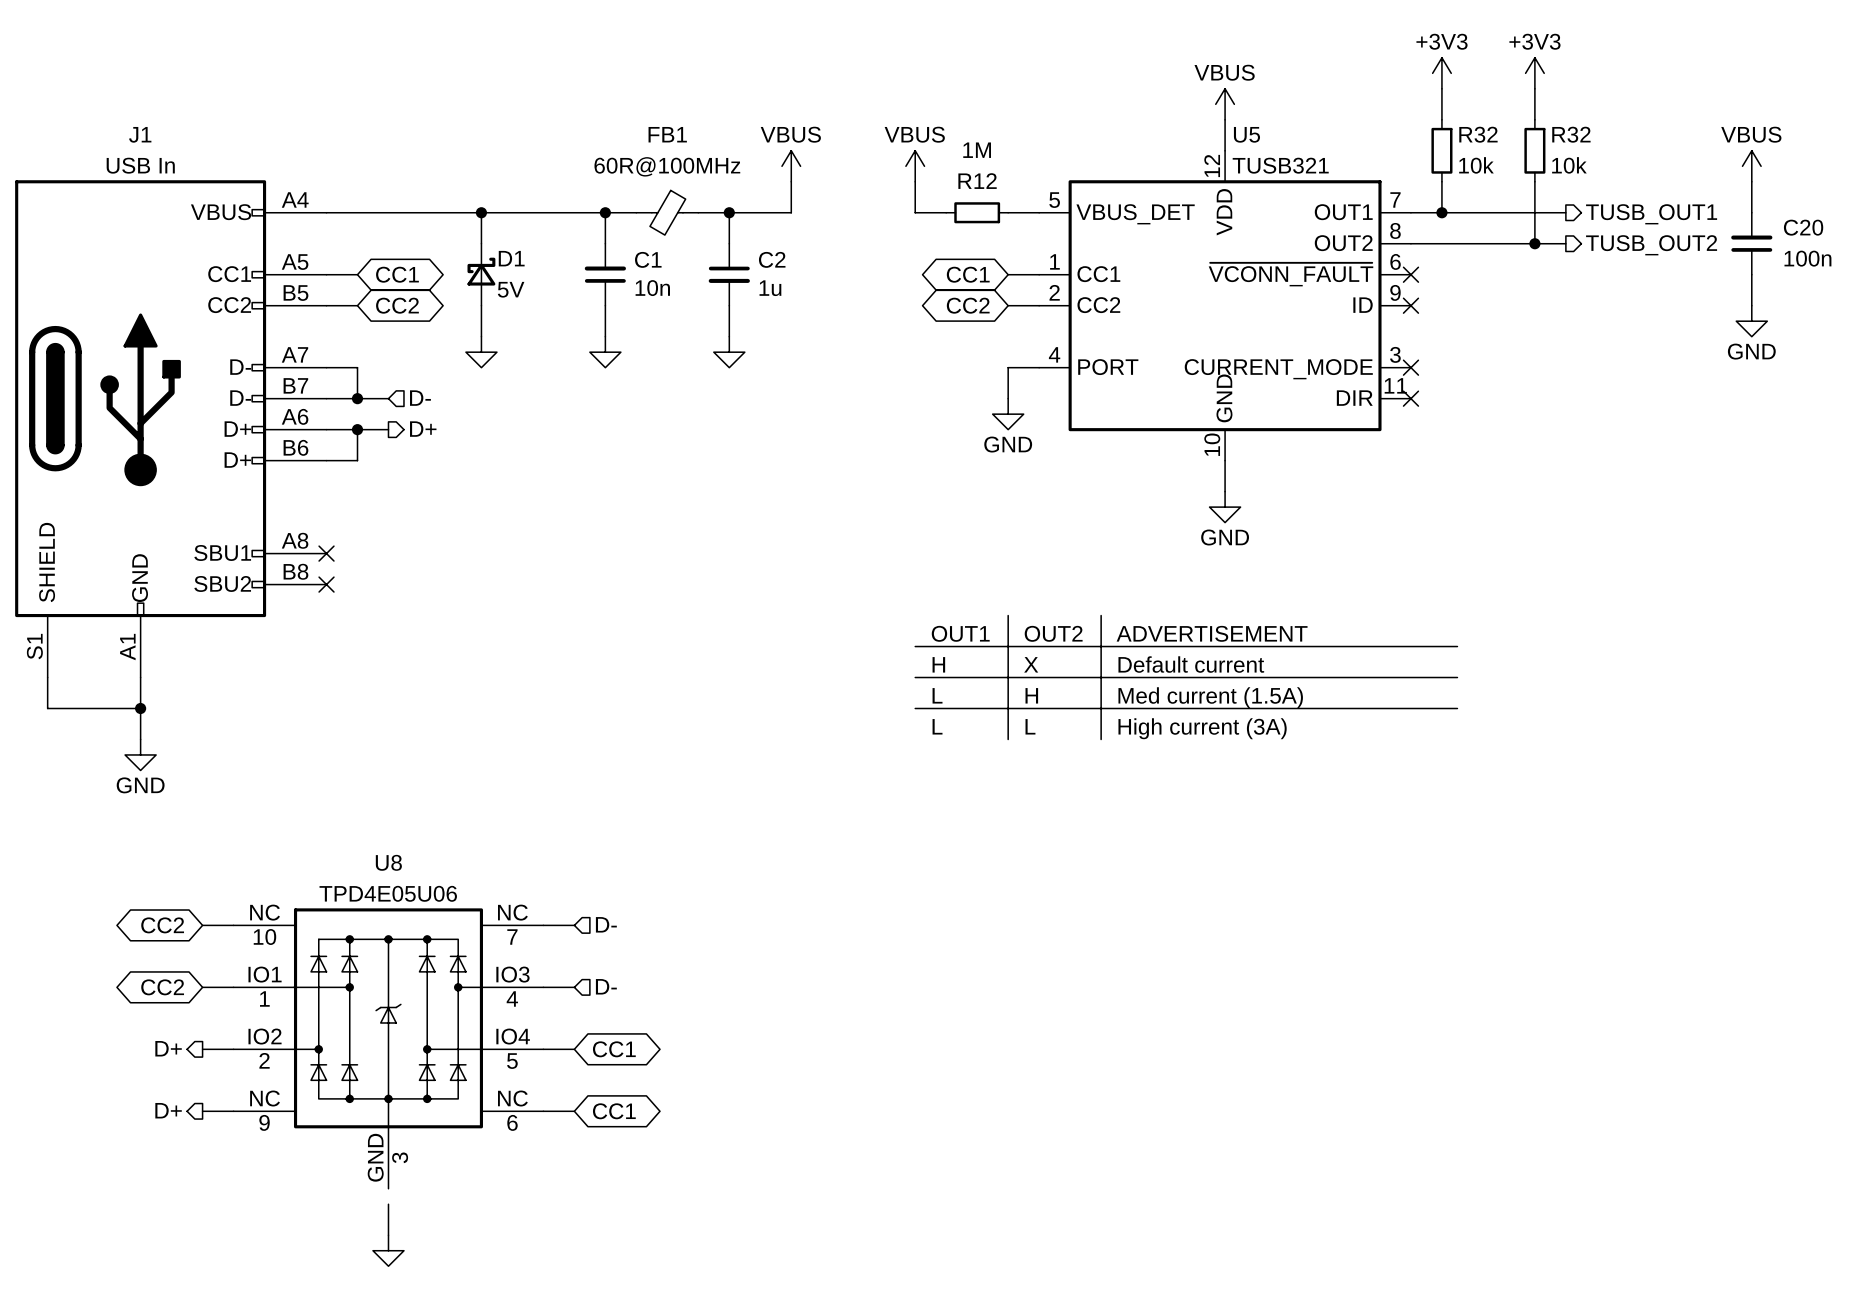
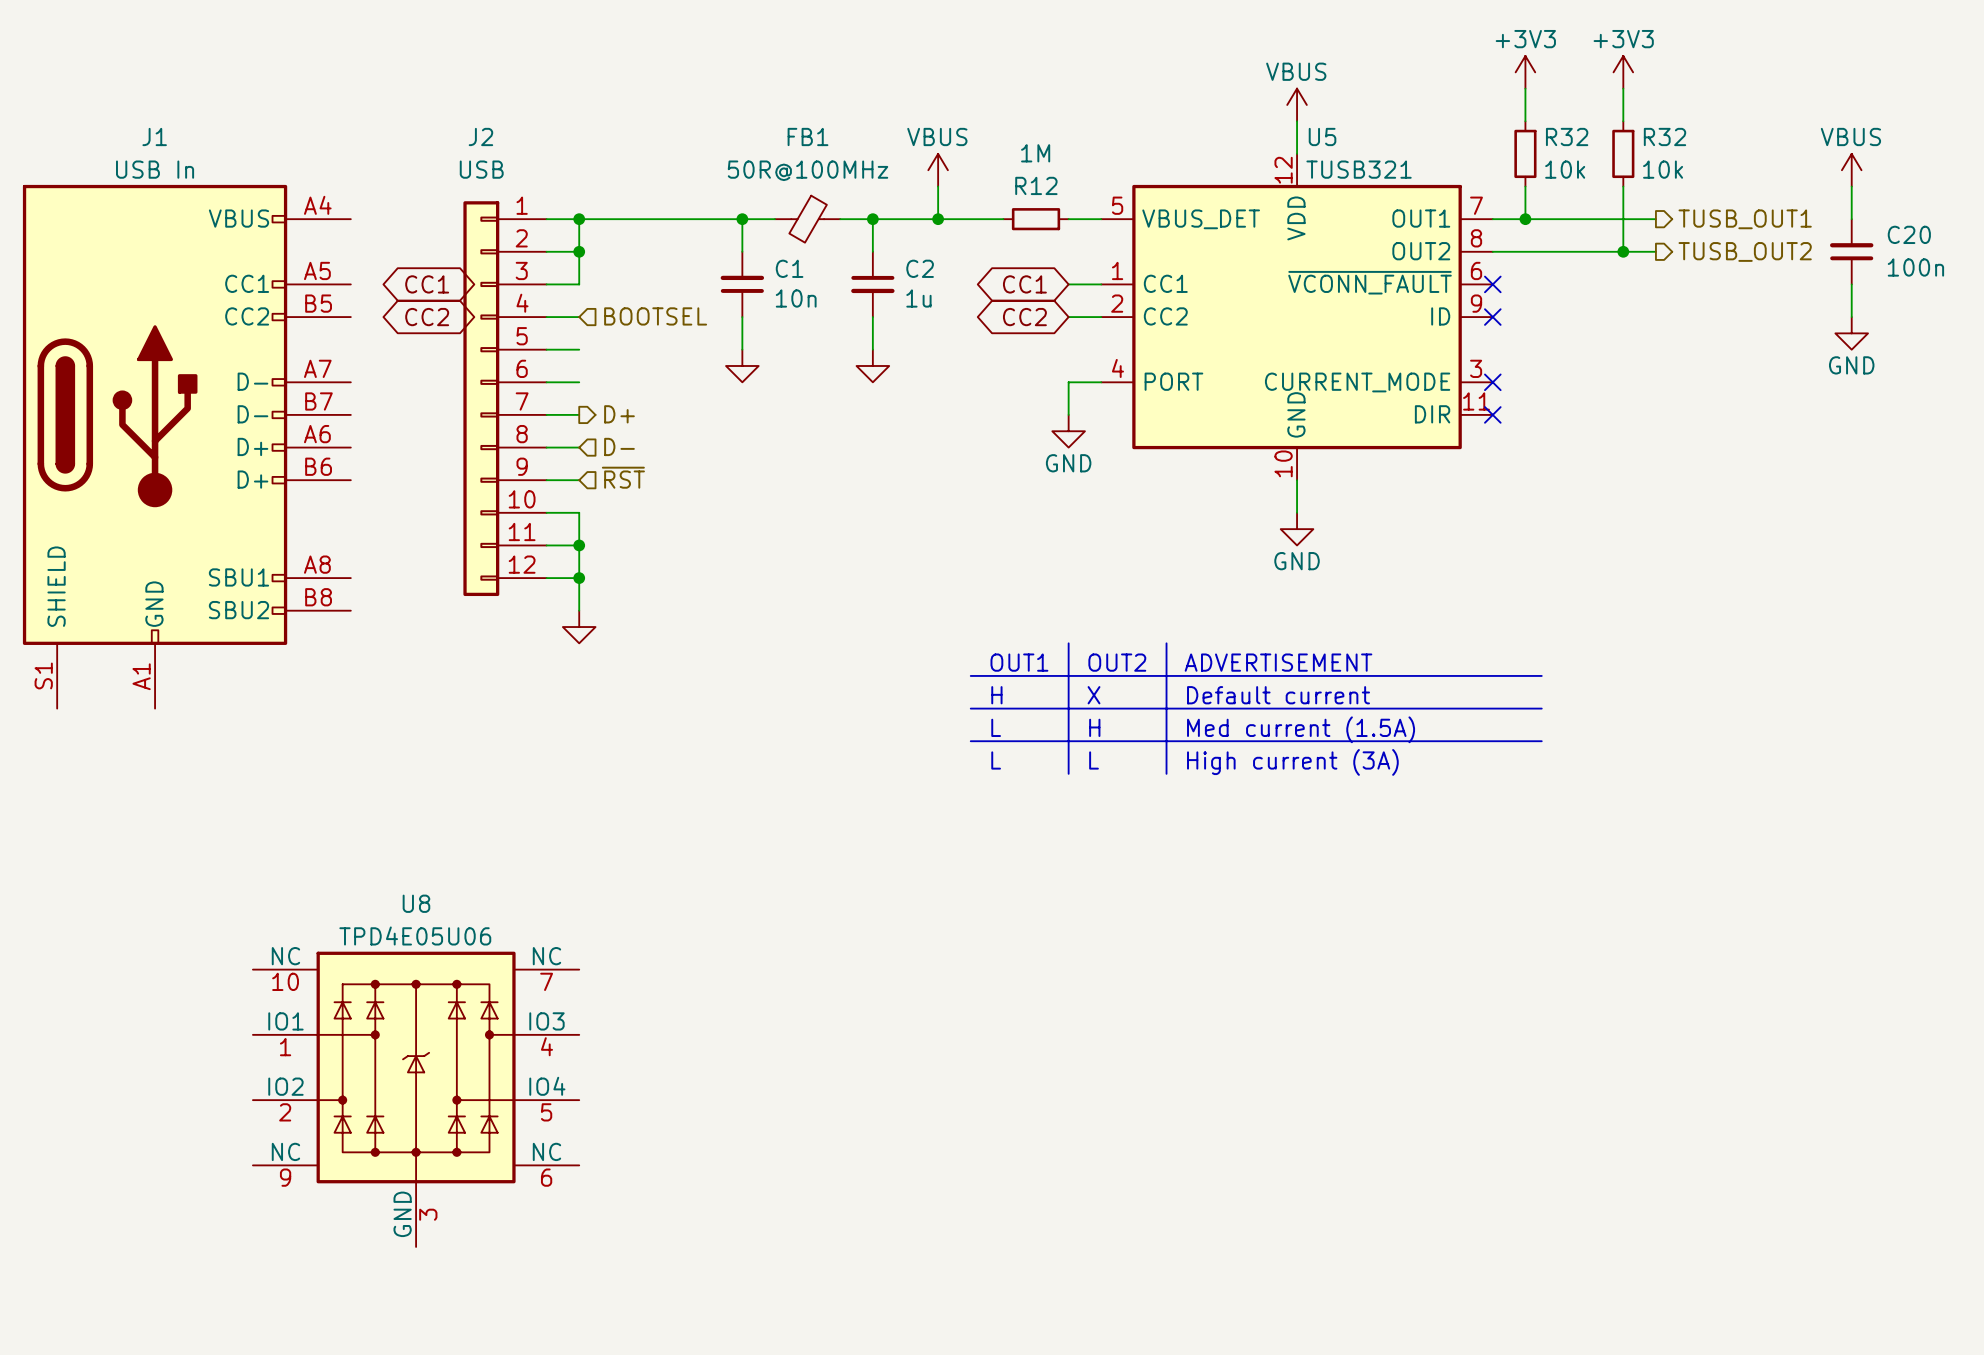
FB1 value: 60R@100MHz (667, 166) -> 50R@100MHz (808, 170)
power symbol: VBUS (791, 166) -> none
power symbol position: VBUS (915, 166) -> VBUS (938, 170)
wire: (791, 181) (791, 212) (729, 212) (729, 243) -> none
wire: (915, 181) (915, 212) -> (840, 219) (970, 219)
wire: (326, 212) (512, 212) -> none
wire: (481, 212) (481, 243) -> none
junction: (481, 212) -> none
wire: none -> (579, 219) (579, 284) (546, 284)
junction: none -> (579, 219)
wire: (605, 212) (605, 243) -> (872, 219) (872, 251)
junction: (605, 212) -> none
wire: none -> (677, 219) (742, 219) (742, 251)
FB1 position: (667, 212) -> (807, 219)
junction position: (729, 212) -> (742, 219)
junction: none -> (872, 219)
junction: none -> (938, 219)
wire: none -> (546, 251) (579, 251)
junction: none -> (579, 251)
wire: (326, 274) (357, 274) -> (546, 317) (579, 317)
D1: 5V (481, 274) -> none
C1 position: (605, 274) -> (742, 284)
C2 position: (729, 274) -> (872, 284)
wire: (326, 305) (357, 305) -> (546, 349) (579, 349)
wire: (481, 305) (481, 336) -> (742, 317) (742, 349)
wire: (605, 305) (605, 336) -> (872, 317) (872, 349)
hierarchical label: none -> BOOTSEL (655, 316)
wire: (729, 305) (729, 336) -> (938, 186) (938, 219)
power symbol: (481, 352) -> none
power symbol: (605, 352) -> none
power symbol position: (729, 352) -> (742, 365)
power symbol: none -> (872, 365)
wire: (326, 367) (357, 367) (357, 398) -> none
wire: none -> (546, 382) (579, 382)
J2: none -> USB (504, 398)
wire: (326, 398) (388, 398) -> none
junction: (357, 398) -> none
hierarchical label position: D- (420, 398) -> D- (619, 446)
wire: none -> (546, 414) (579, 414)
wire: (326, 429) (388, 429) -> none
wire: (357, 429) (357, 460) (326, 460) -> none
junction: (357, 429) -> none
hierarchical label position: D+ (423, 429) -> D+ (619, 414)
wire: none -> (546, 447) (579, 447)
hierarchical label: none -> ~{RST} (623, 477)
wire: none -> (546, 480) (579, 480)
wire: none -> (546, 512) (579, 512) (579, 610)
wire: none -> (546, 545) (579, 545)
junction: none -> (579, 545)
no-connect mark: (326, 553) -> none
wire: none -> (546, 578) (579, 578)
junction: none -> (579, 578)
no-connect mark: (326, 584) -> none
power symbol: none -> (579, 627)
wire: (47, 677) (47, 708) (140, 708) -> none
wire: (140, 677) (140, 739) -> none
junction: (140, 708) -> none
power symbol: GND (140, 754) -> none
hierarchical label: D- (606, 924) -> none
global label: CC2 (162, 925) -> none
wire: (202, 925) (233, 925) -> none
wire: (543, 925) (574, 925) -> none
hierarchical label: D- (606, 986) -> none
global label: CC2 (162, 987) -> none
wire: (202, 987) (233, 987) -> none
wire: (543, 987) (574, 987) -> none
hierarchical label: D+ (168, 1048) -> none
wire: (202, 1049) (233, 1049) -> none
wire: (543, 1049) (574, 1049) -> none
global label: CC1 (614, 1049) -> none
hierarchical label: D+ (168, 1110) -> none
wire: (202, 1111) (233, 1111) -> none
wire: (543, 1111) (574, 1111) -> none
global label: CC1 (614, 1111) -> none
wire: (388, 1204) (388, 1235) -> none
power symbol: (388, 1250) -> none

